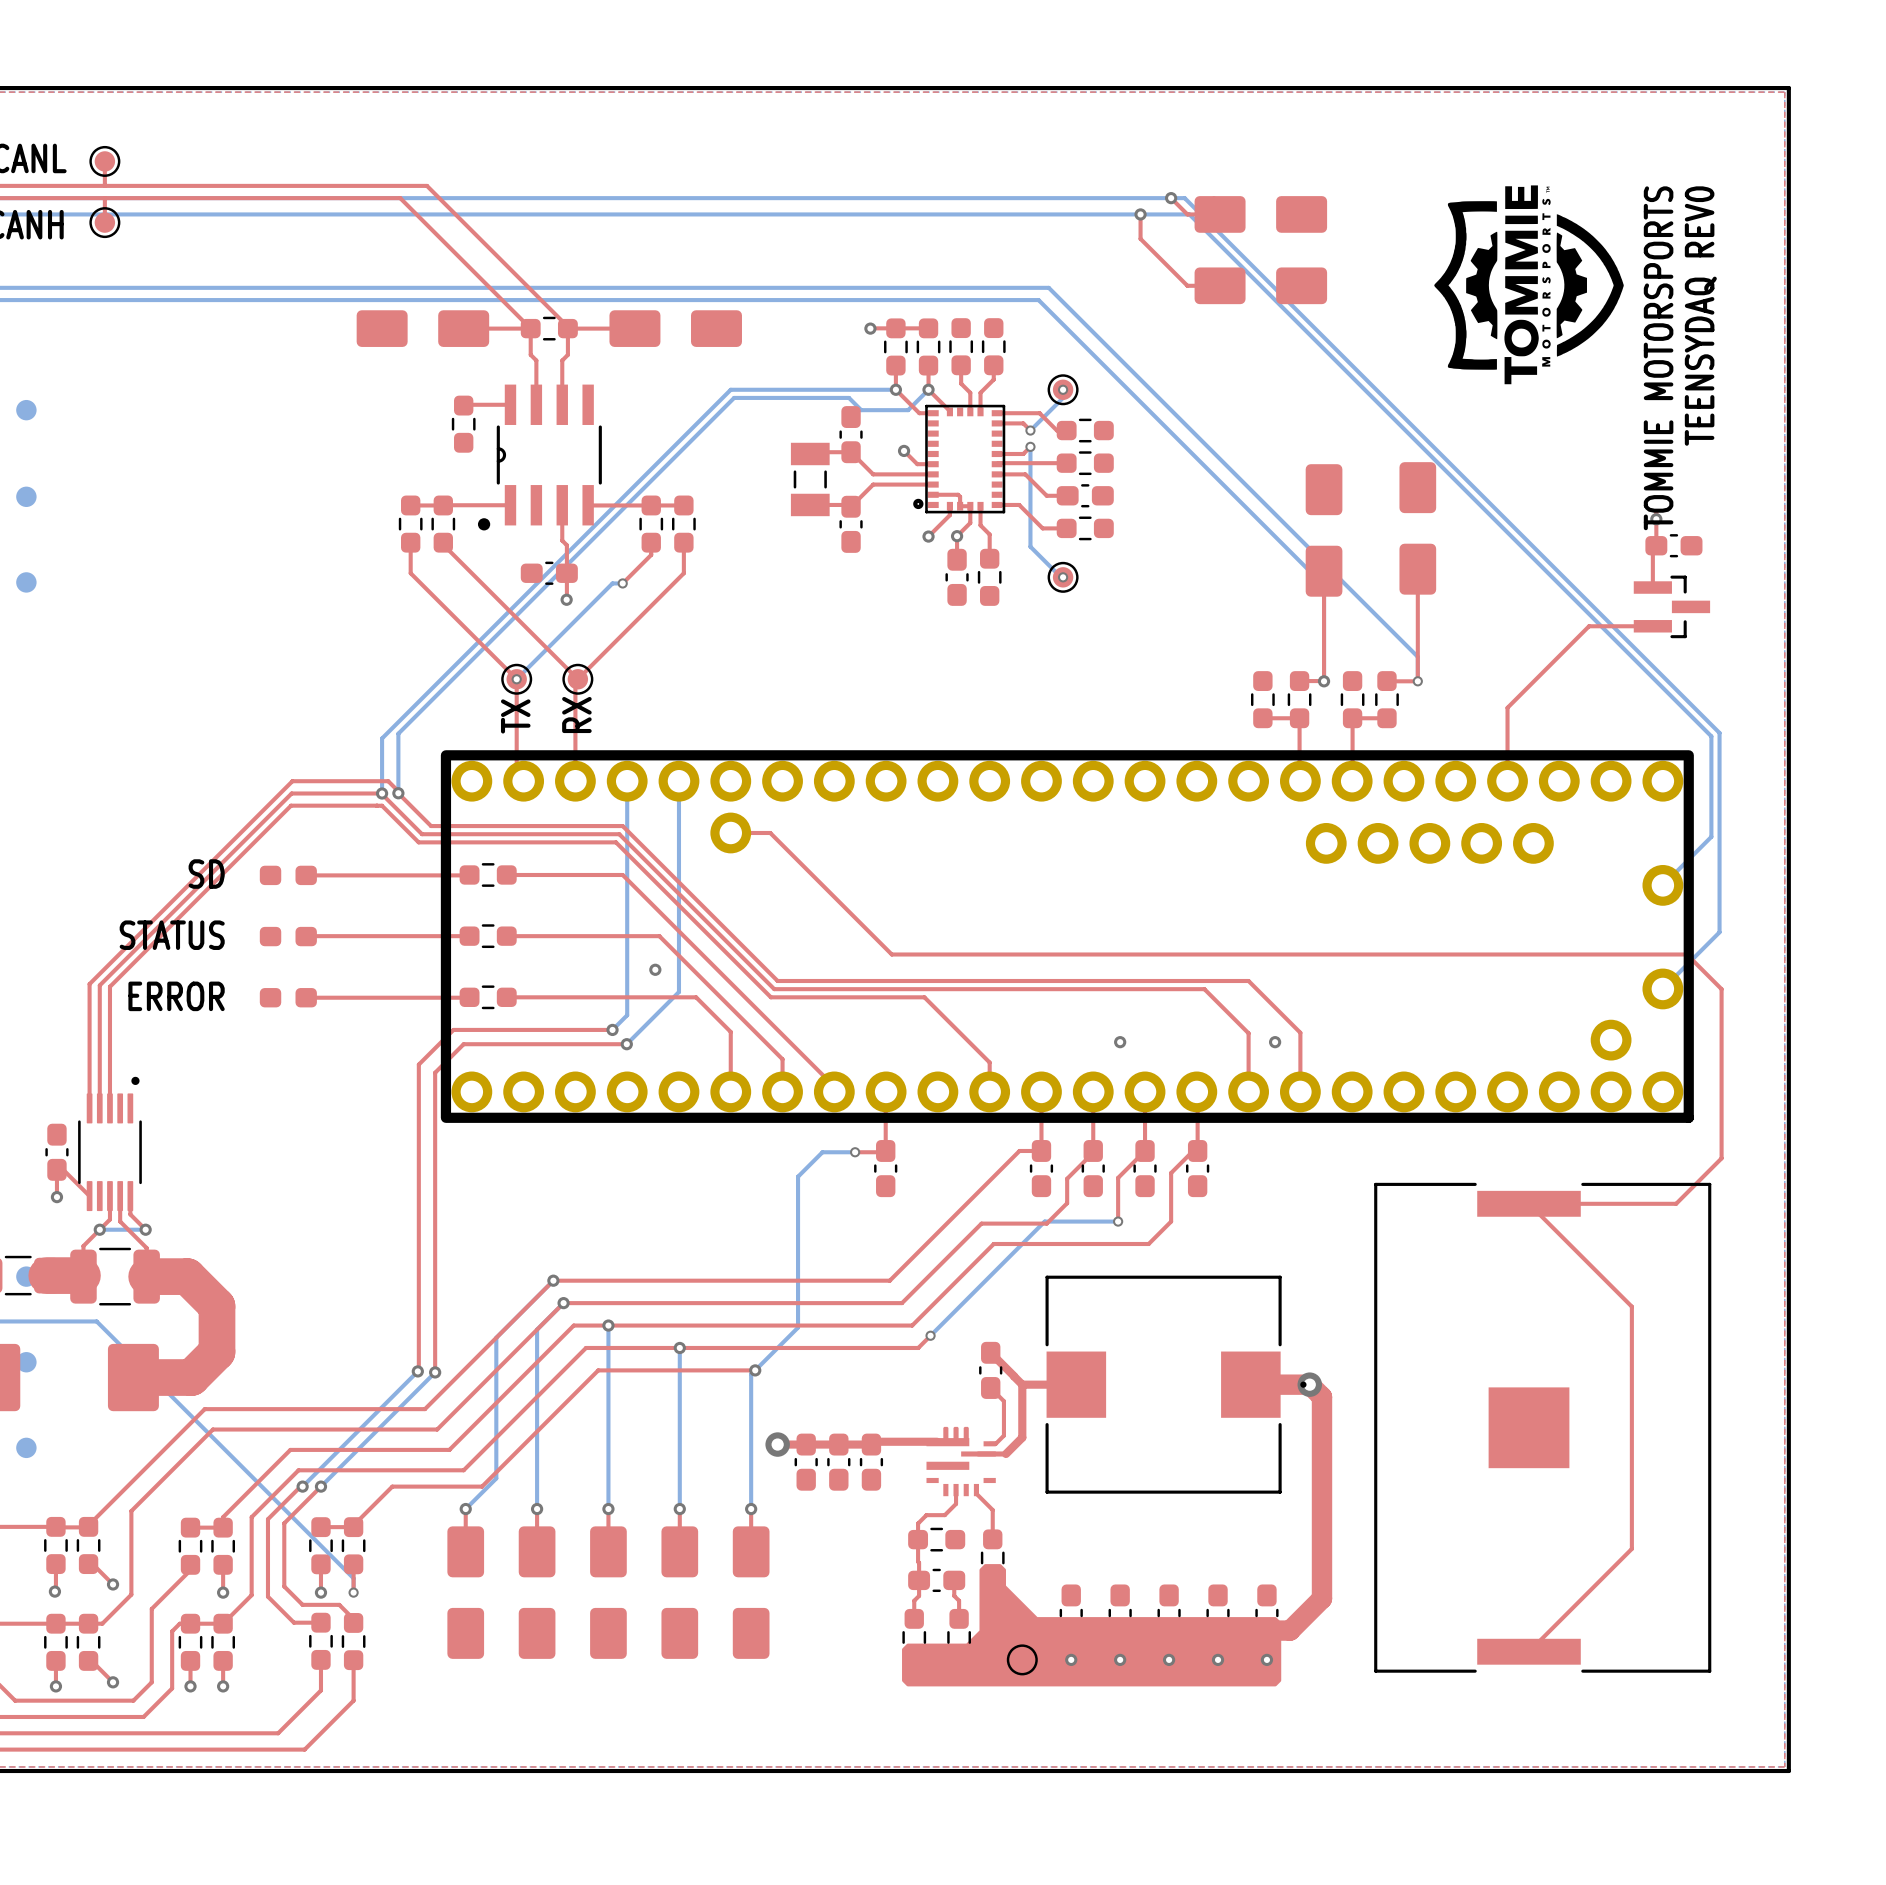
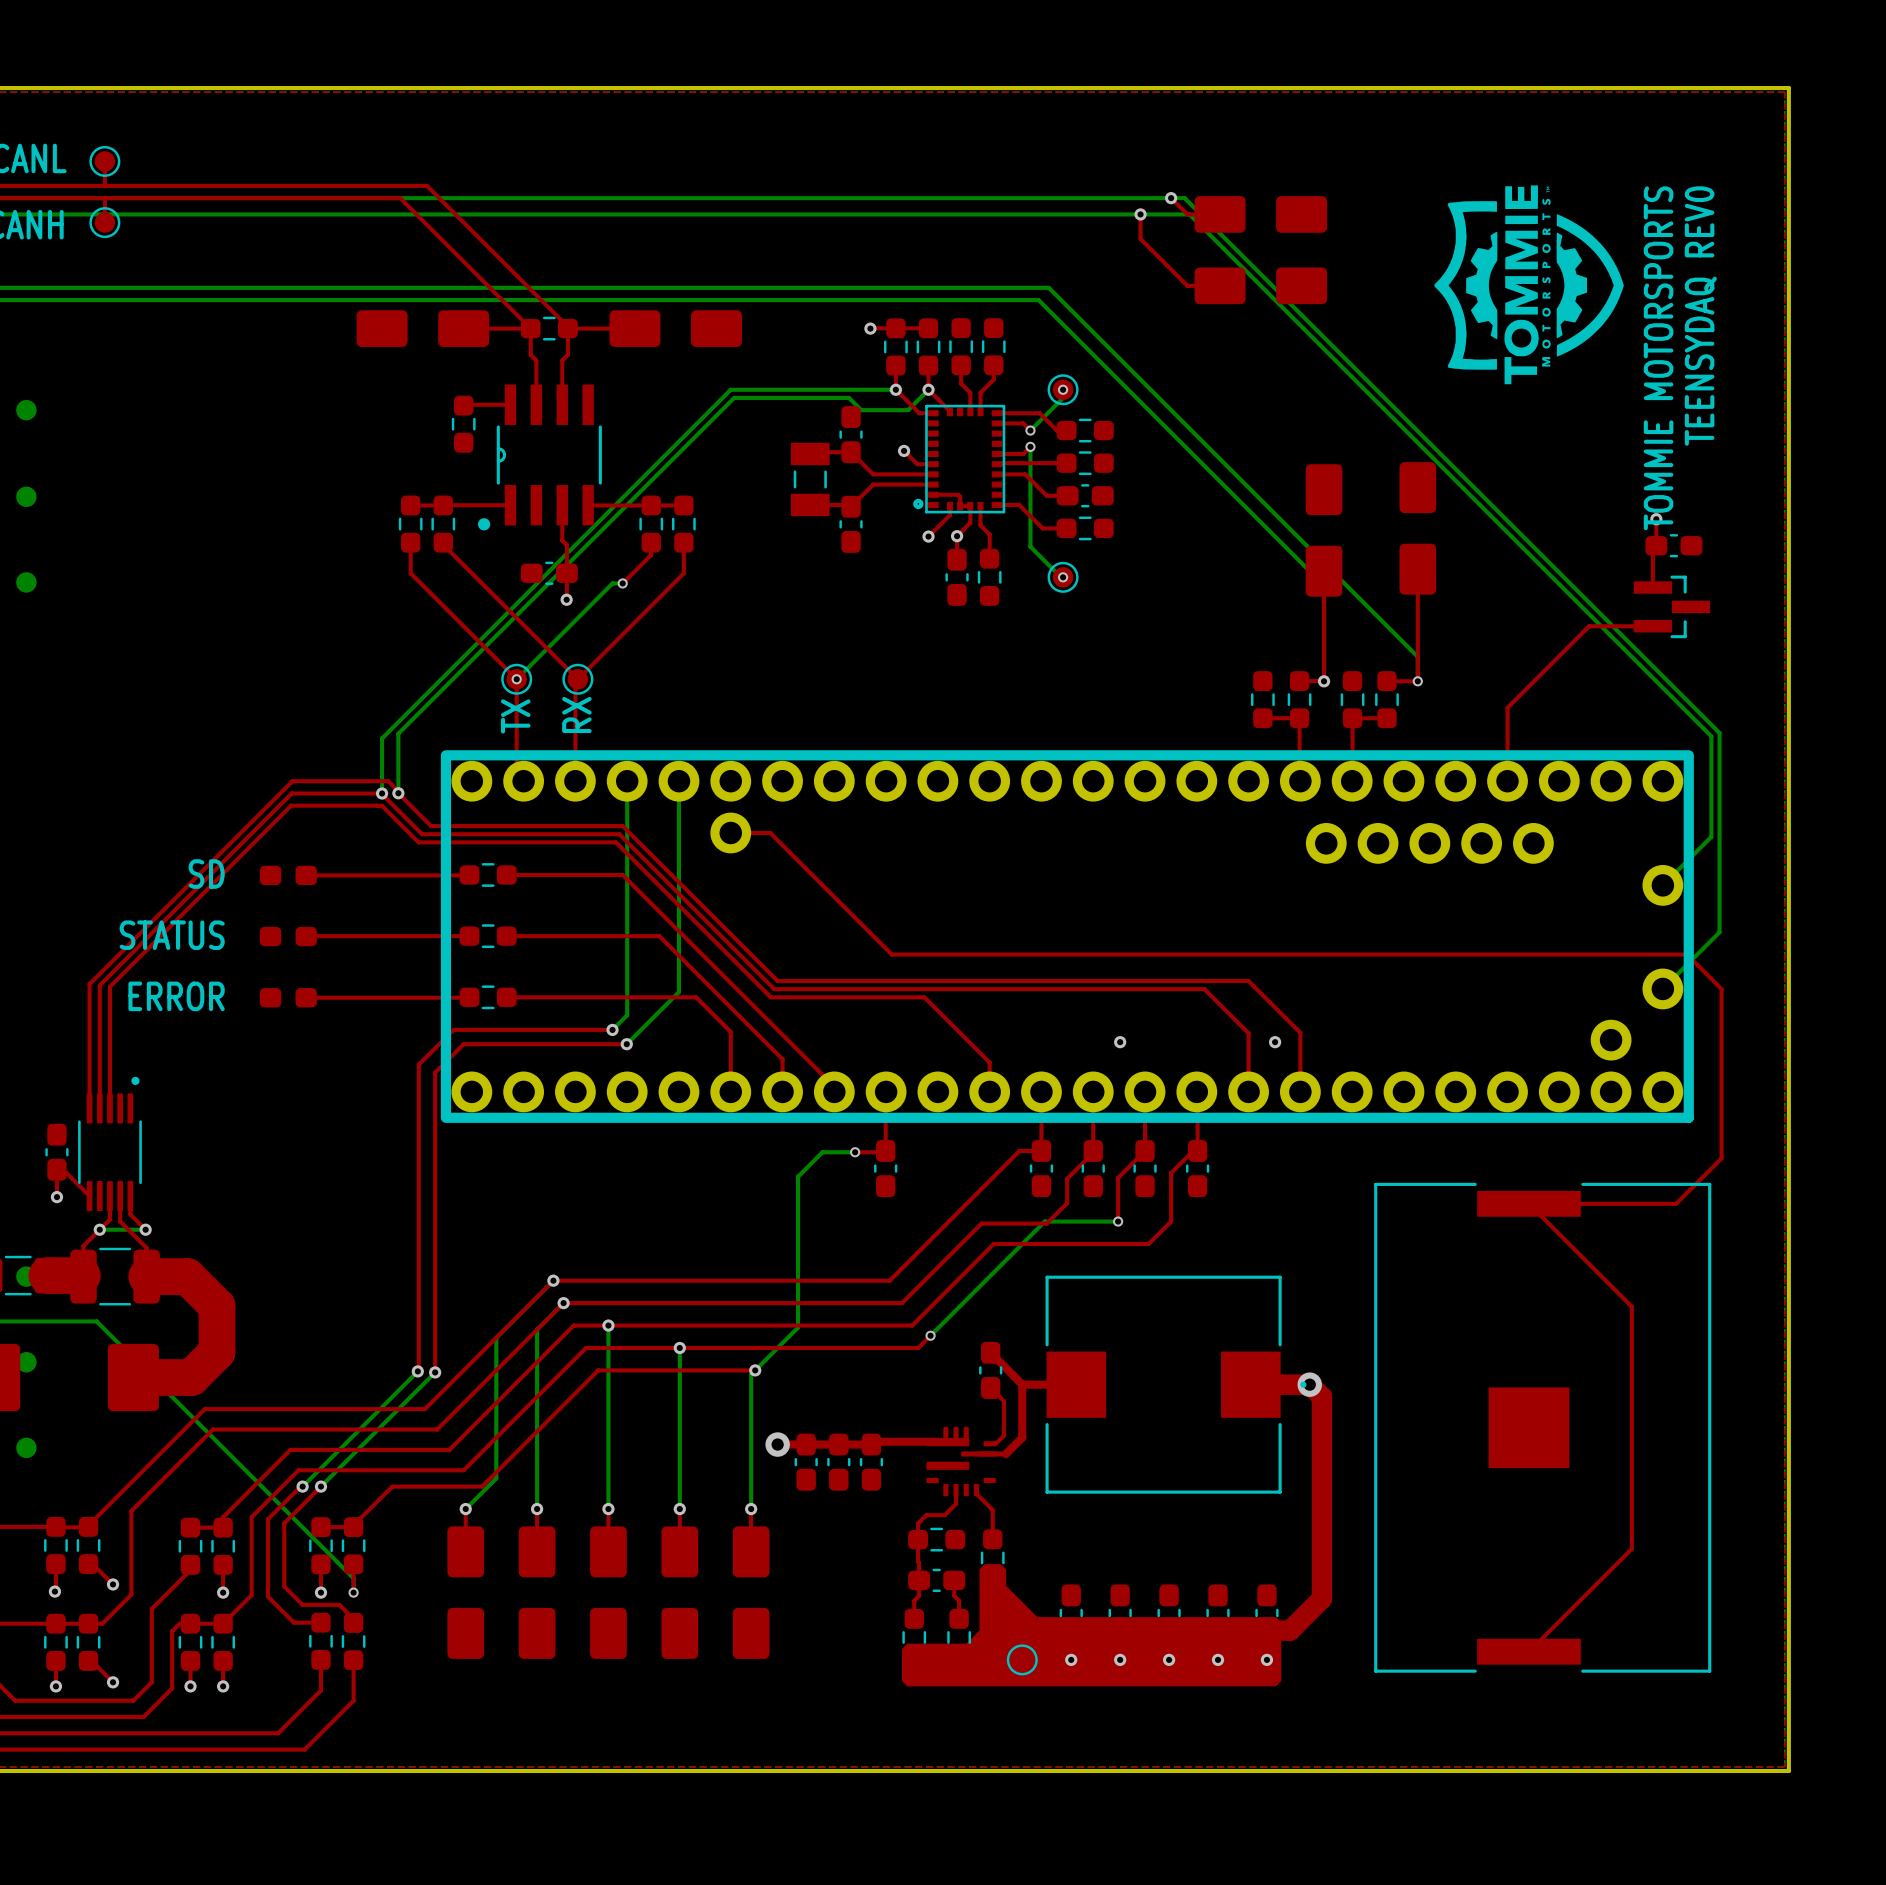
via: (655, 969) -> none

